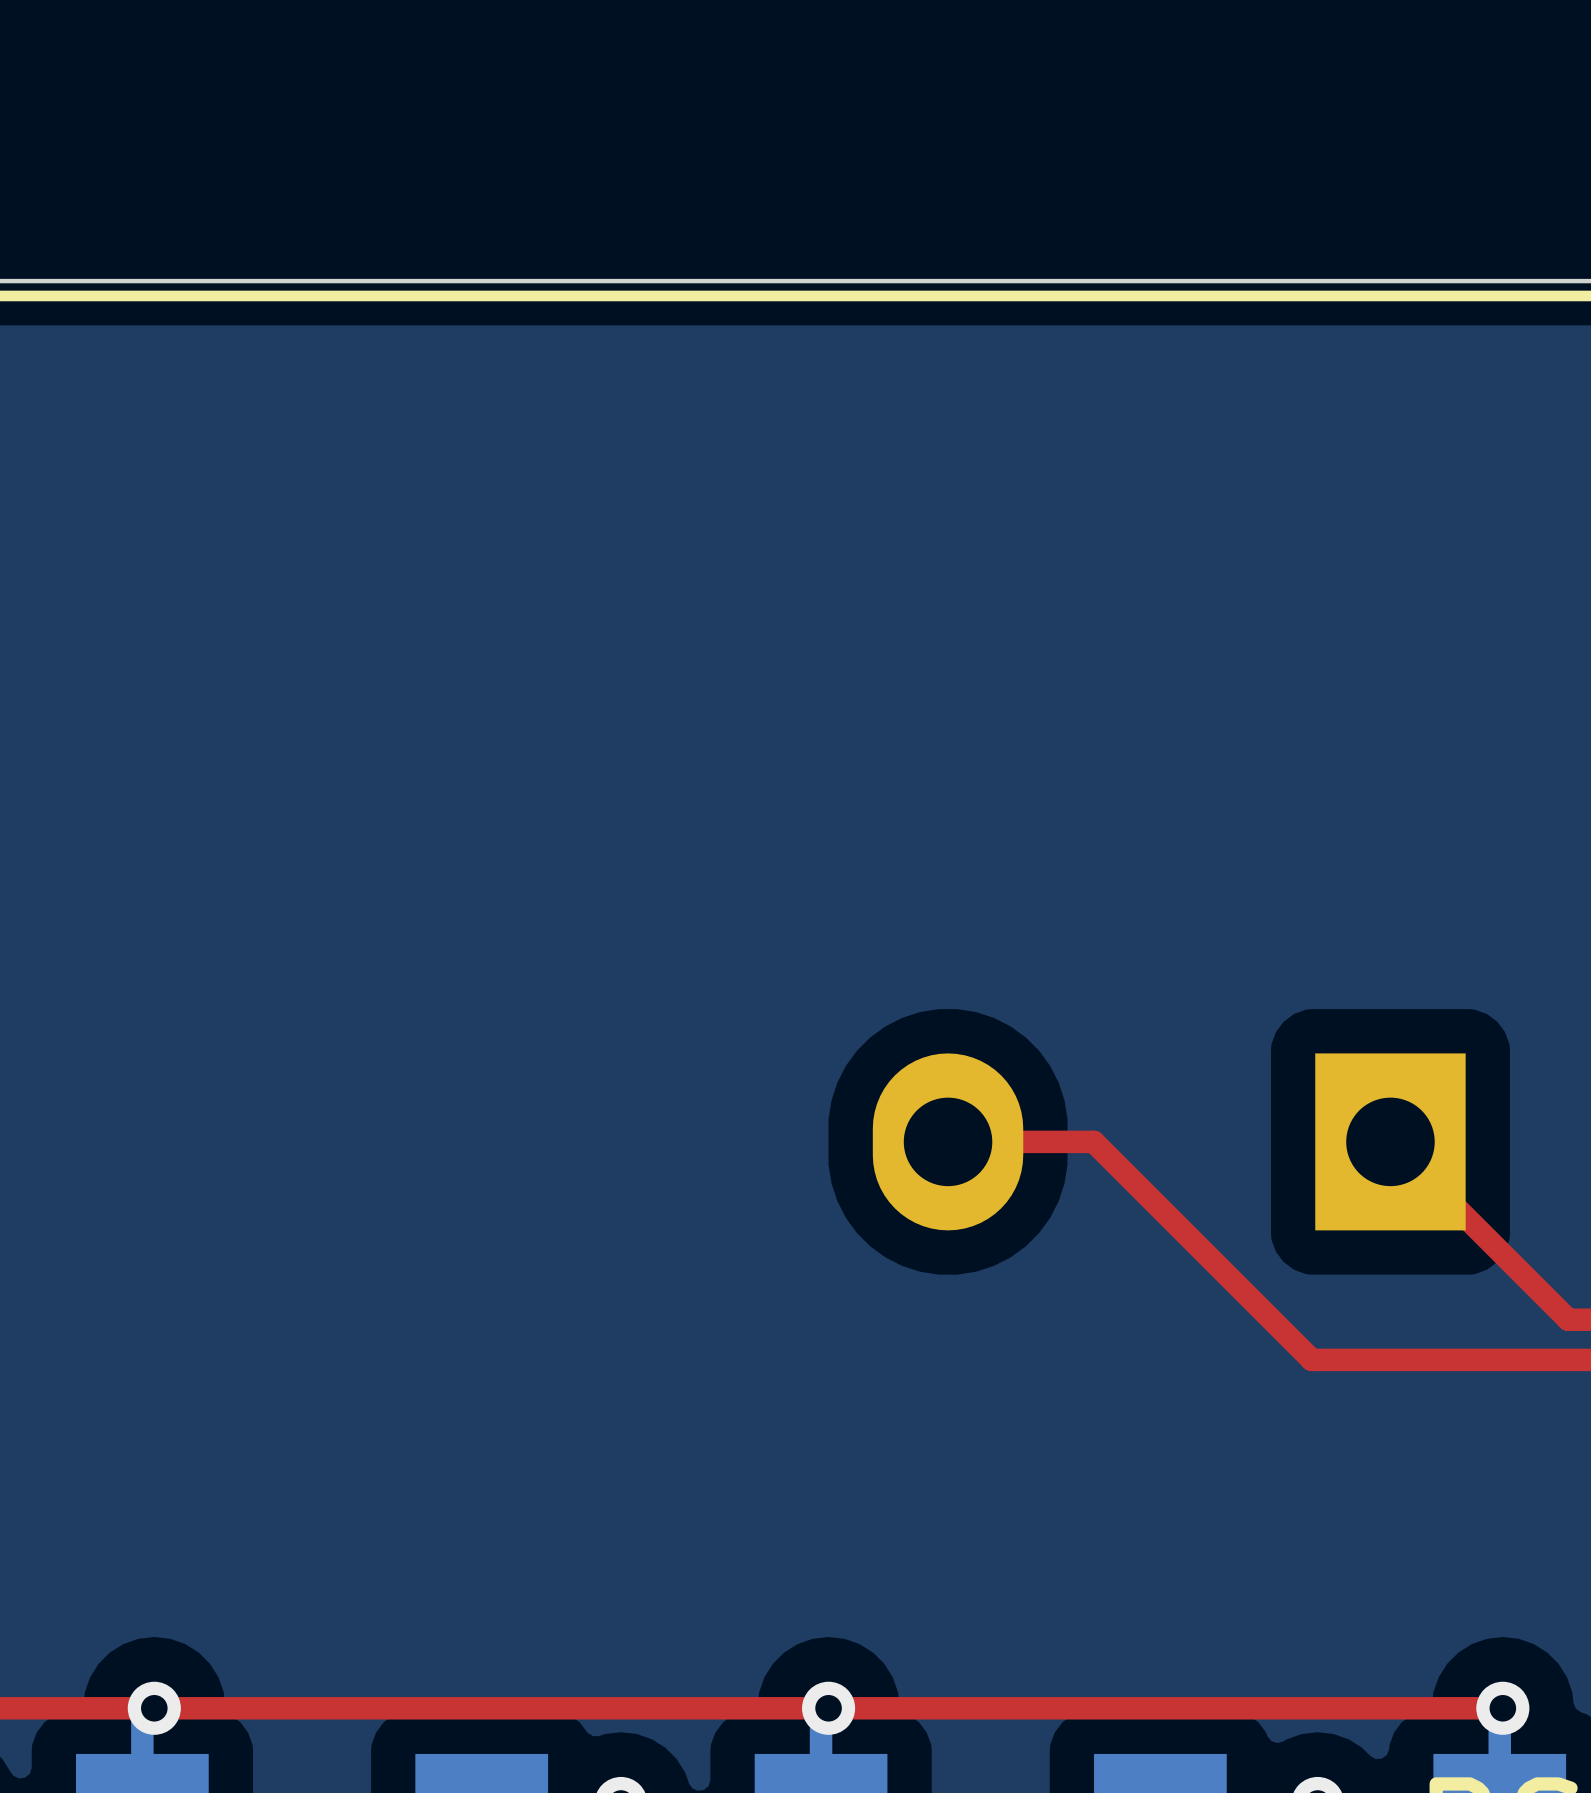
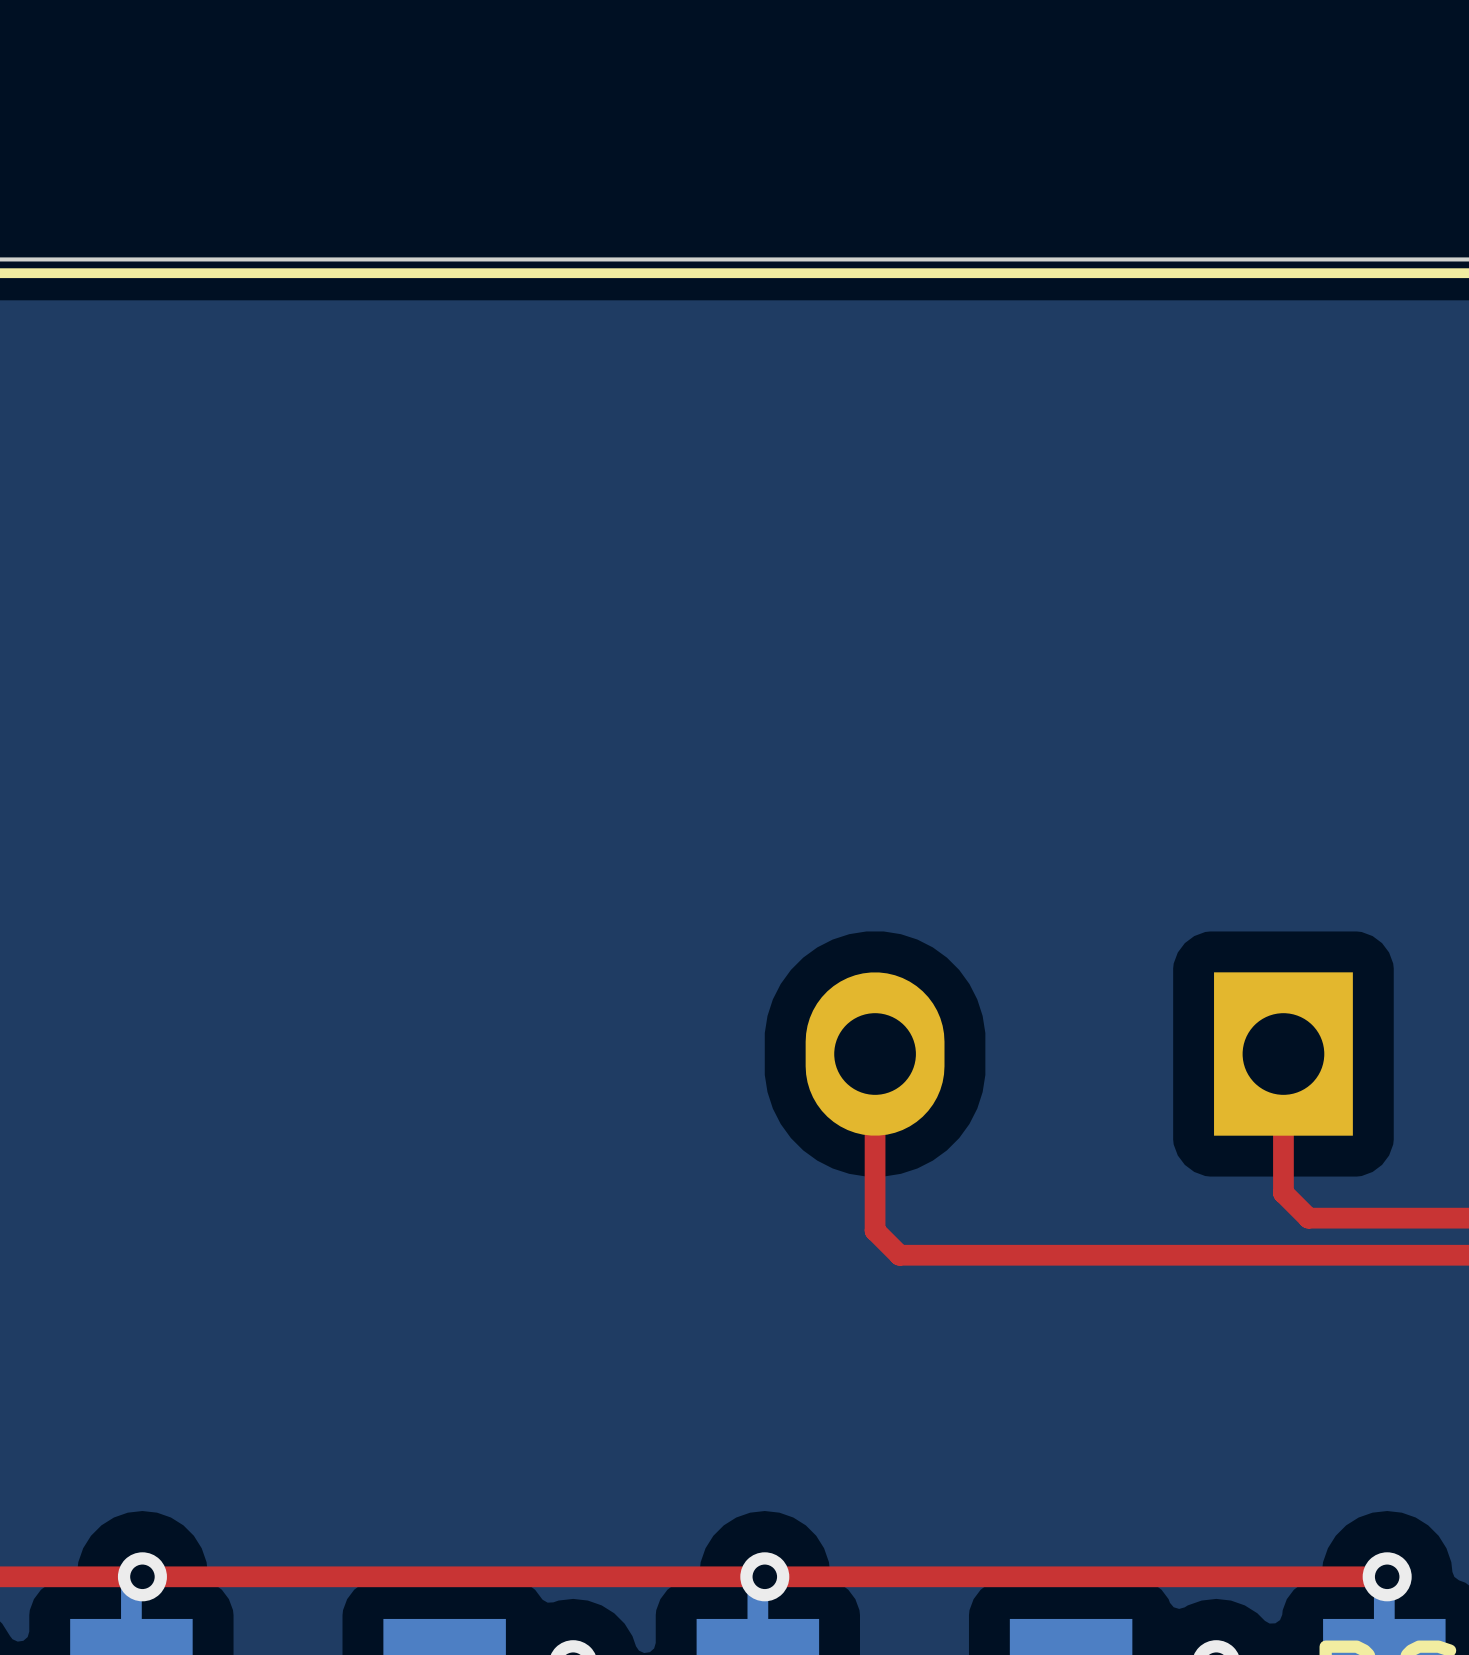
top track: (948, 1141) (1093, 1141) (1311, 1359) -> (875, 1054) (875, 1230) (899, 1255) (1210, 1255)
top track: (1390, 1141) (1568, 1319) -> (1283, 1054) (1283, 1193) (1308, 1218) (1447, 1218)

